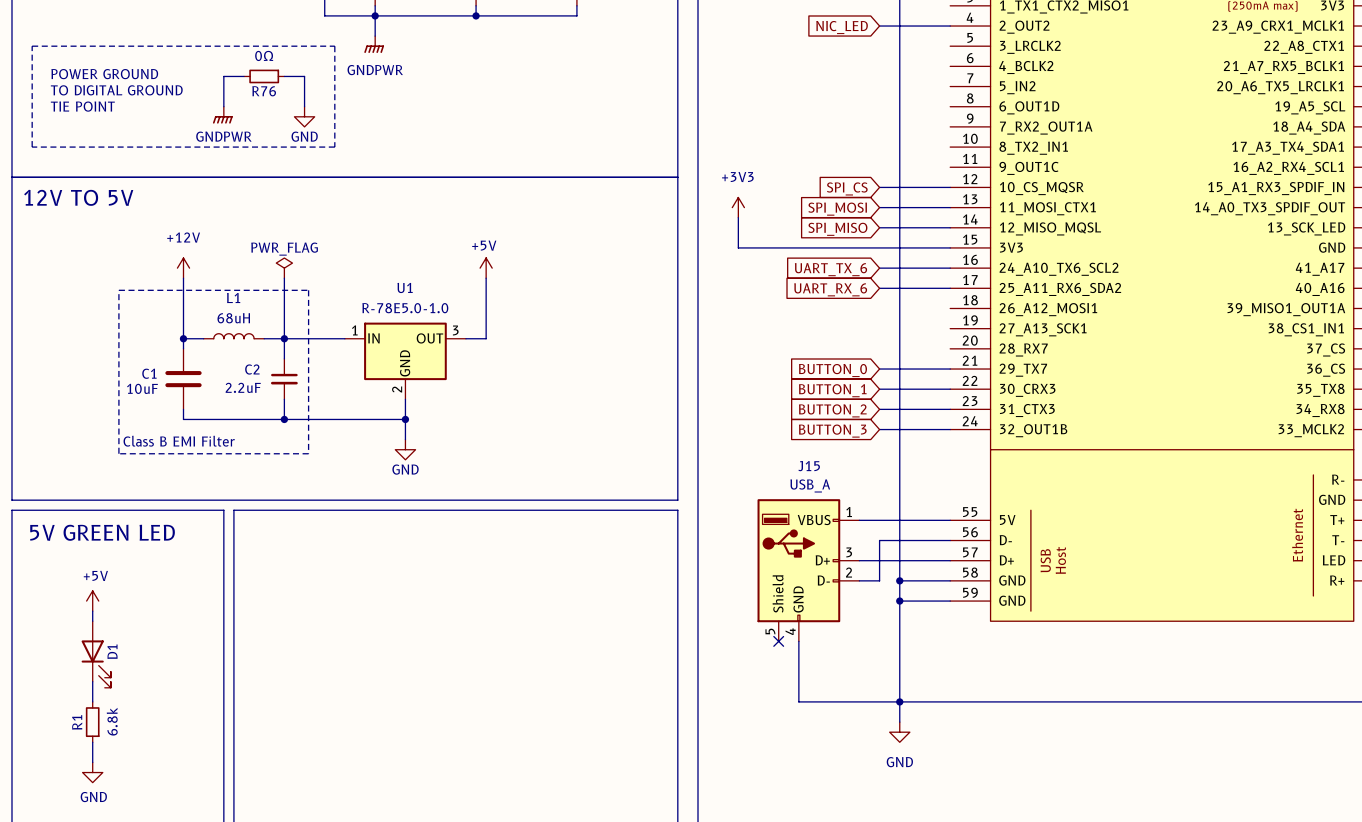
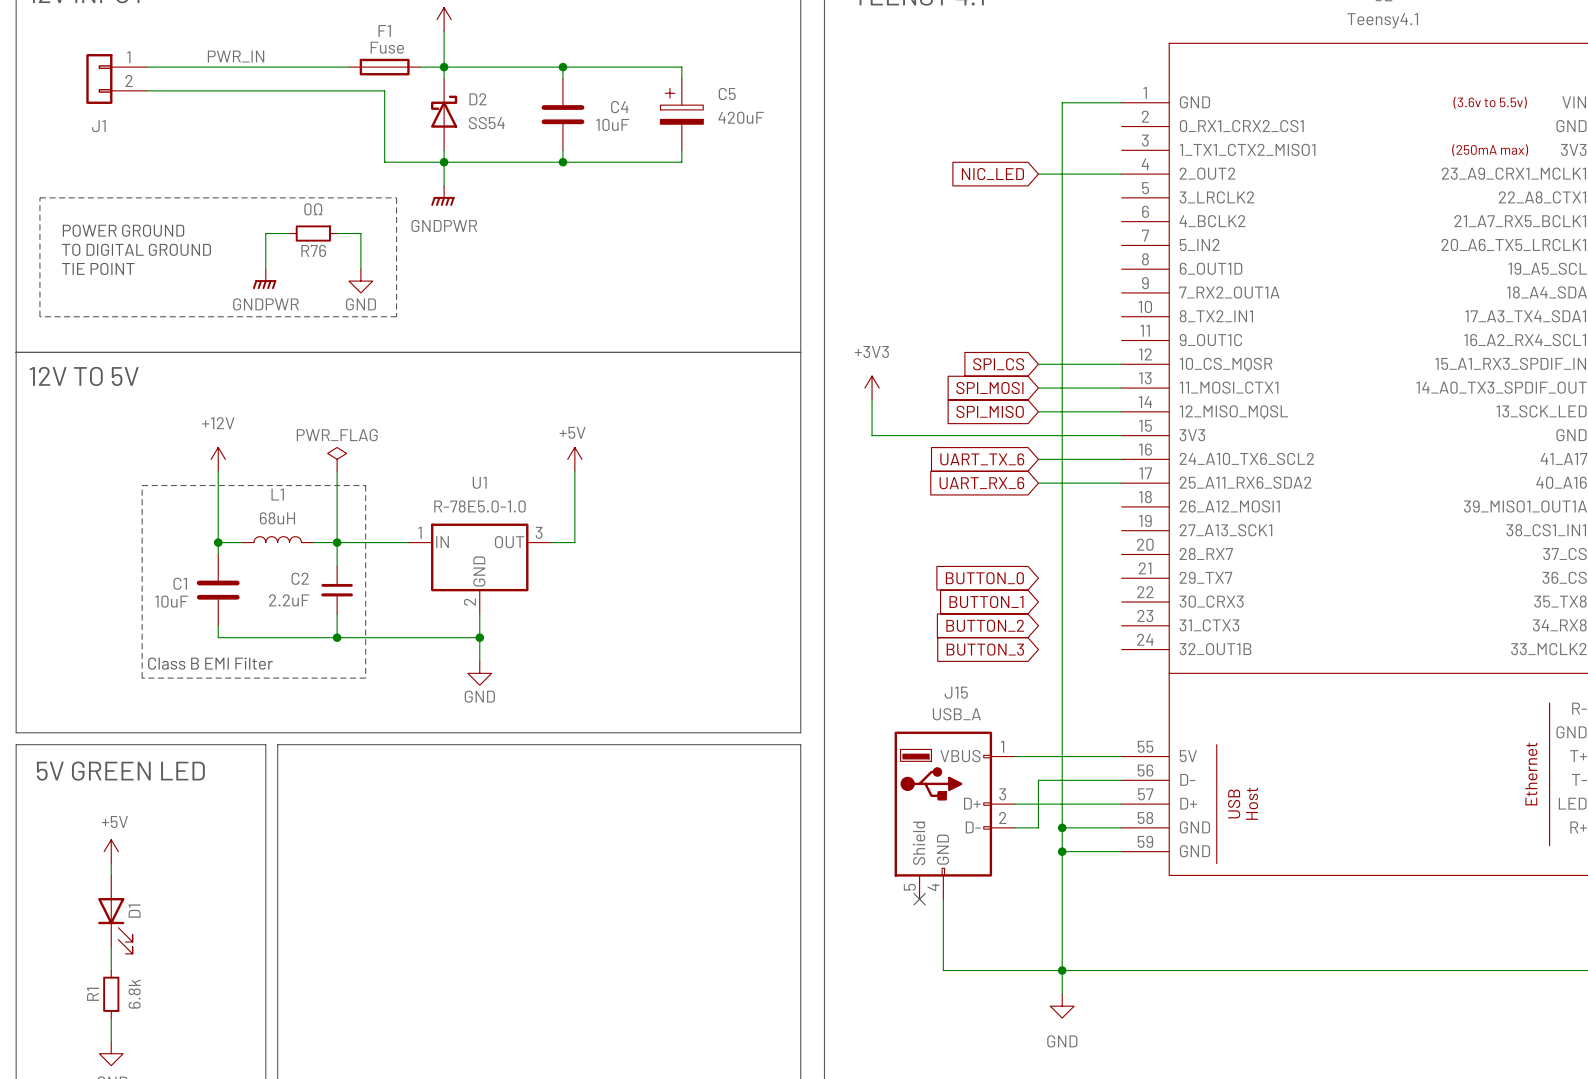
wire: (879, 369) (950, 369) -> none
wire: (879, 389) (950, 389) -> none
wire: (879, 409) (950, 409) -> none
wire: (879, 429) (950, 429) -> none

